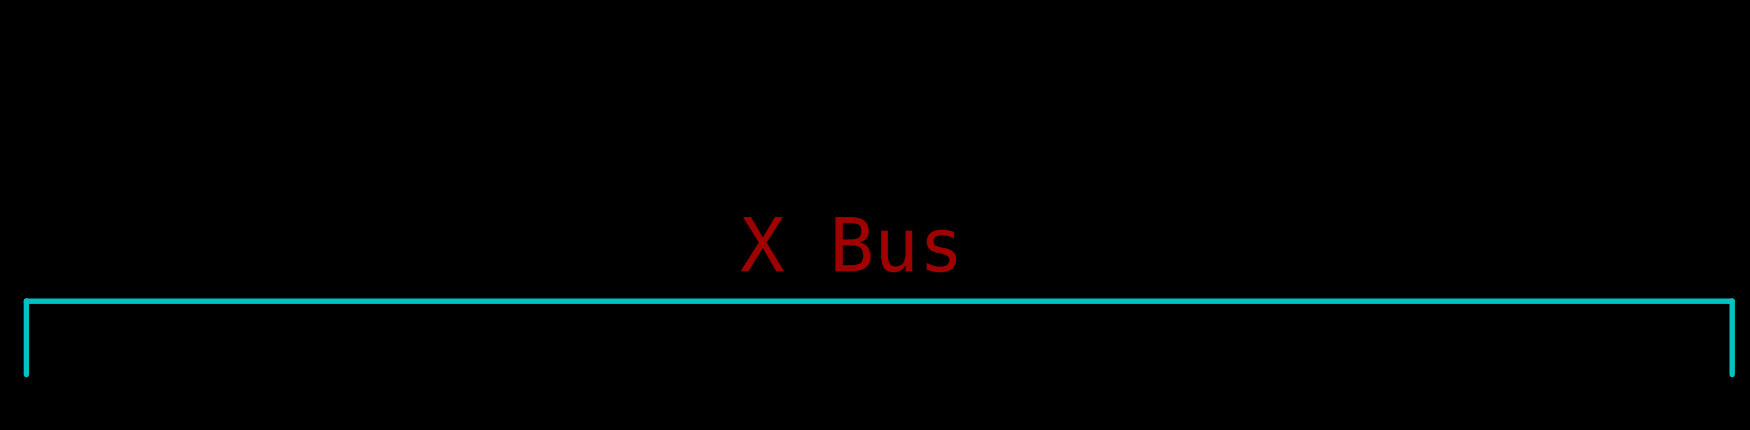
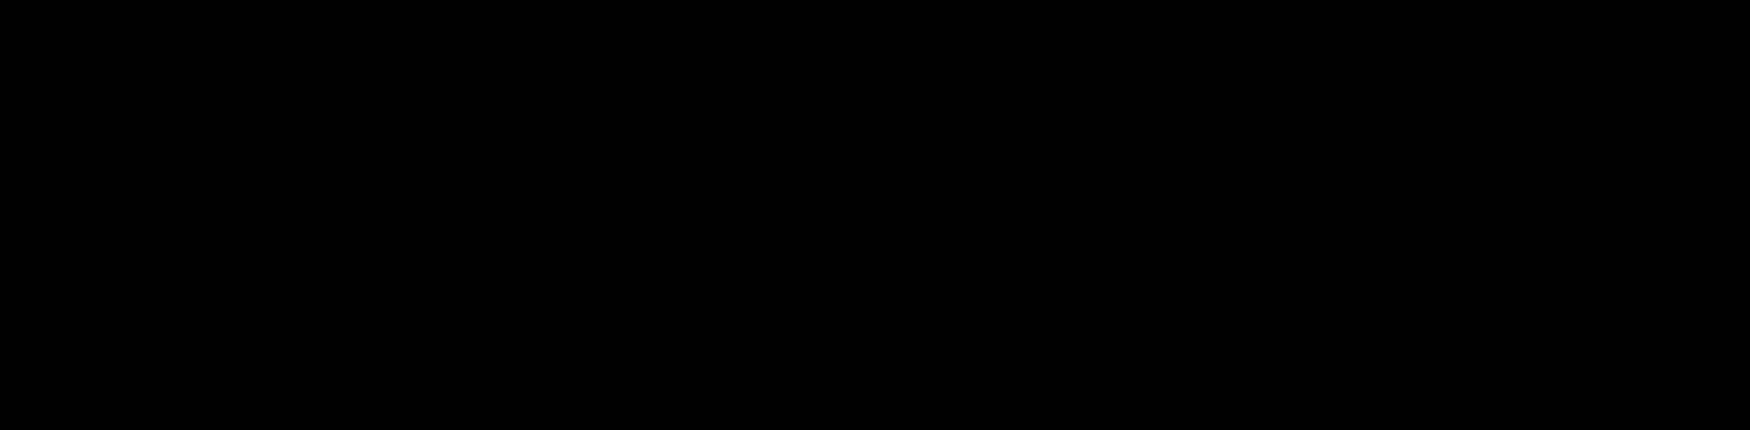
text: X Bus (848, 244) -> none
line: (26, 374) (26, 301) (1732, 301) (1732, 374) -> none

